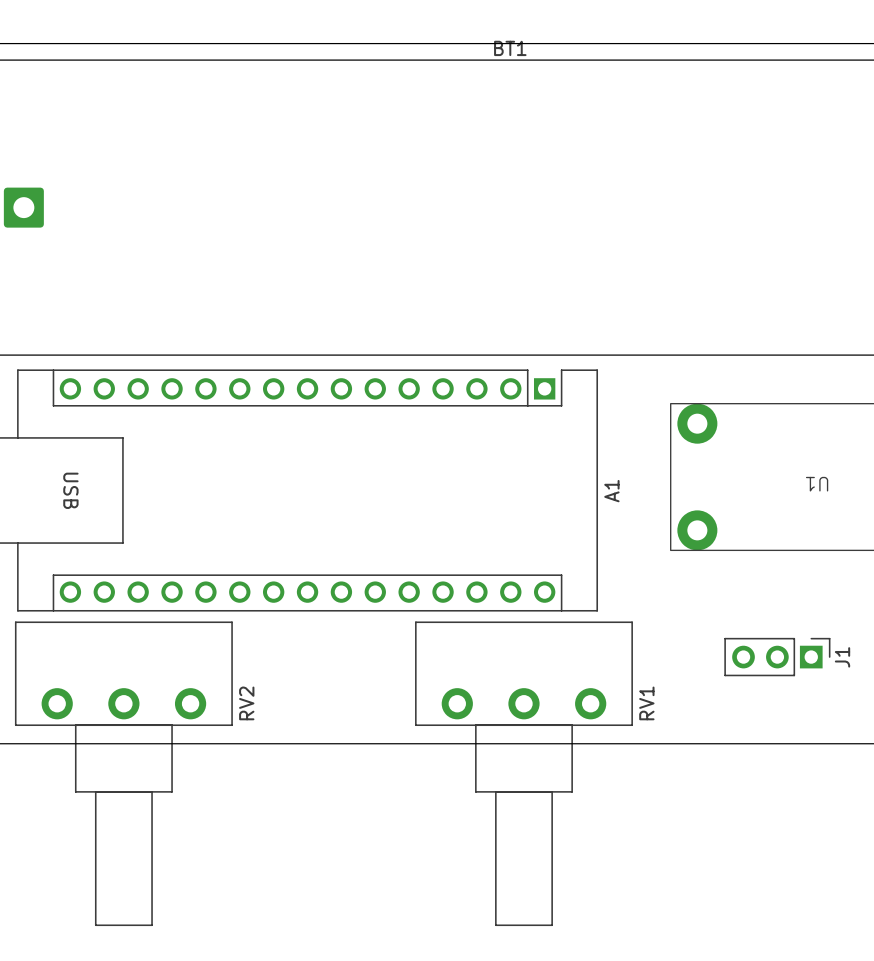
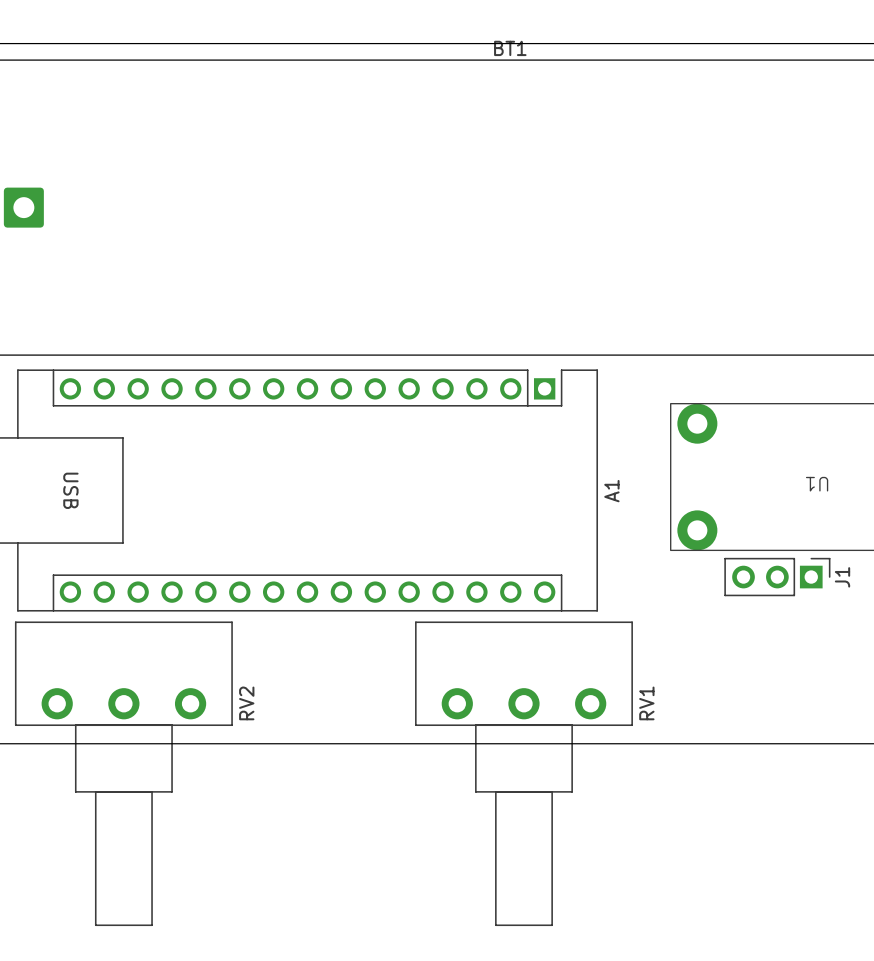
J1 position: (777, 657) -> (777, 577)

